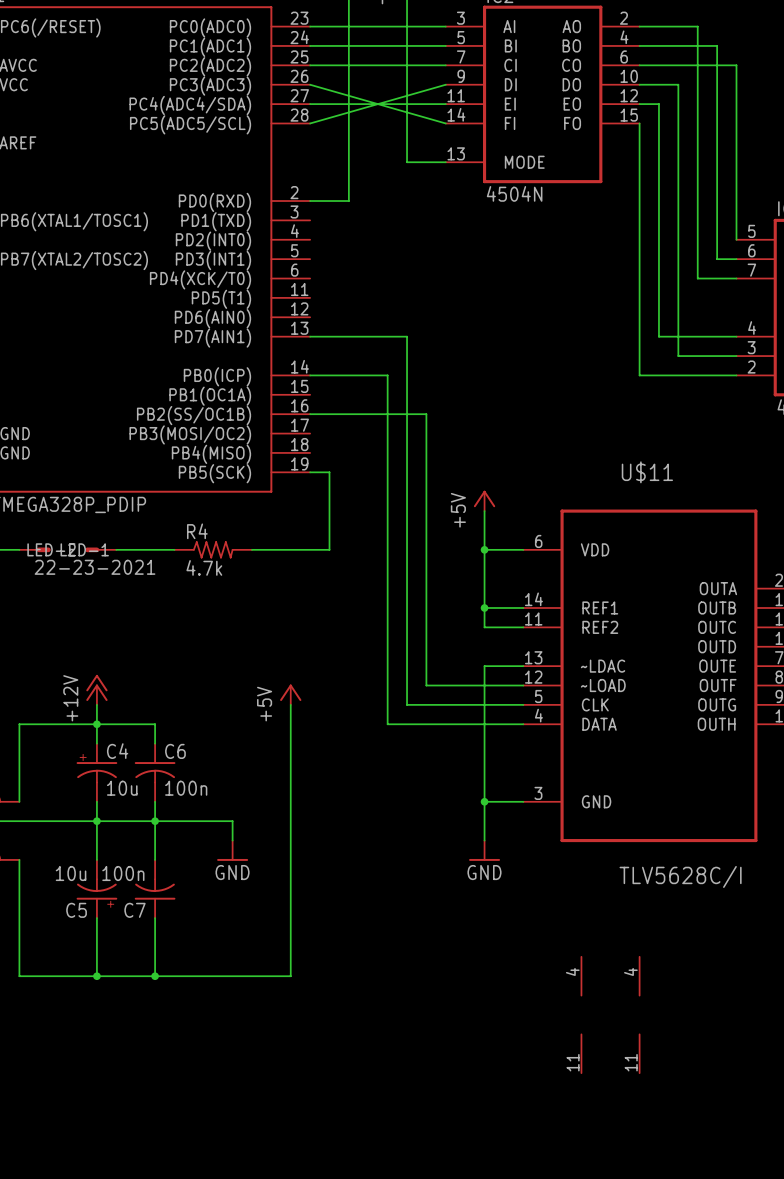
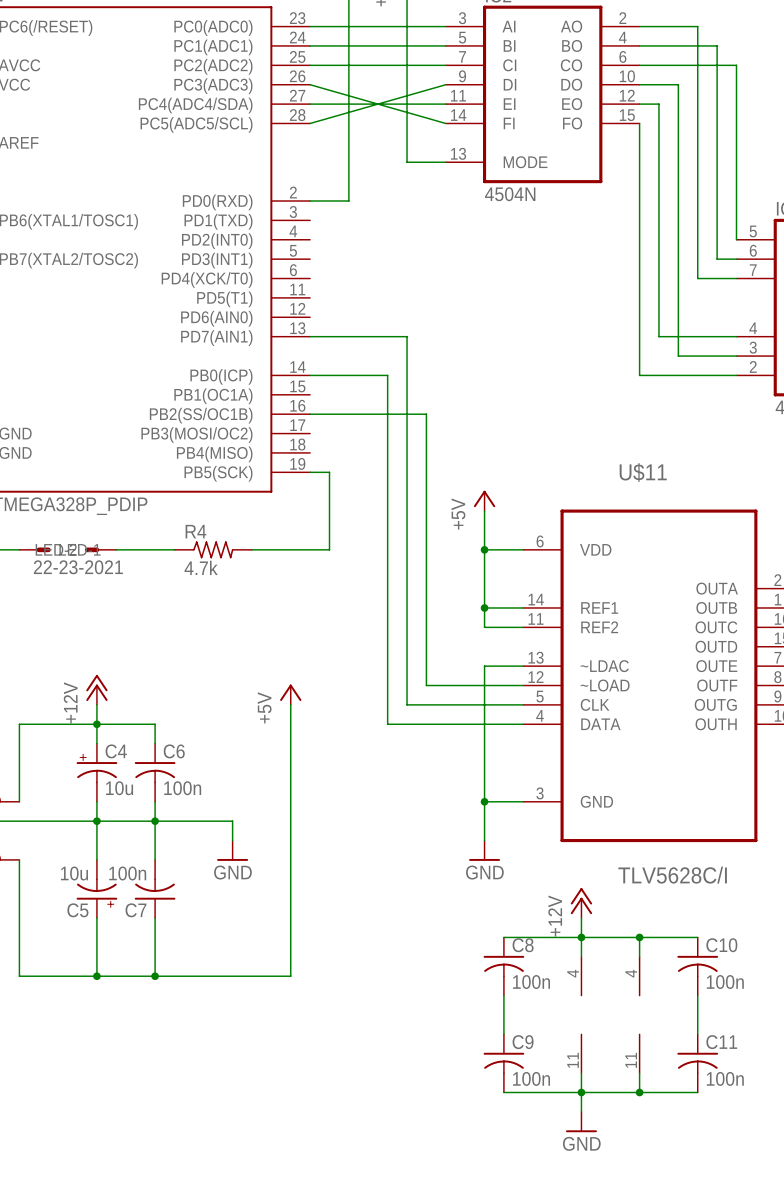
power symbol: none -> +12V (581, 903)
wire: none -> (581, 918) (581, 956)
wire: none -> (503, 937) (697, 937)
junction: none -> (581, 937)
wire: none -> (639, 937) (639, 956)
junction: none -> (639, 937)
C8: none -> 100n (503, 966)
C10: none -> 100n (697, 966)
wire: none -> (503, 995) (503, 1034)
wire: none -> (697, 995) (697, 1034)
C9: none -> 100n (503, 1063)
C11: none -> 100n (697, 1063)
wire: none -> (581, 1073) (581, 1111)
wire: none -> (639, 1073) (639, 1092)
wire: none -> (503, 1092) (697, 1092)
junction: none -> (581, 1092)
junction: none -> (639, 1092)
power symbol: none -> GND (581, 1122)

